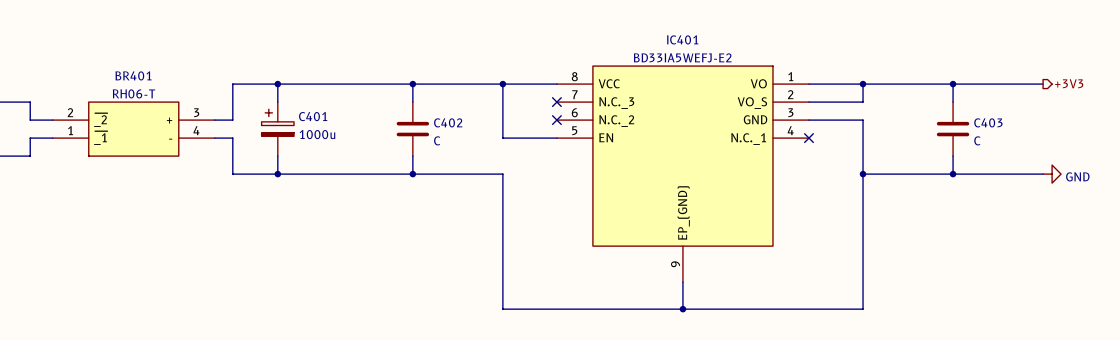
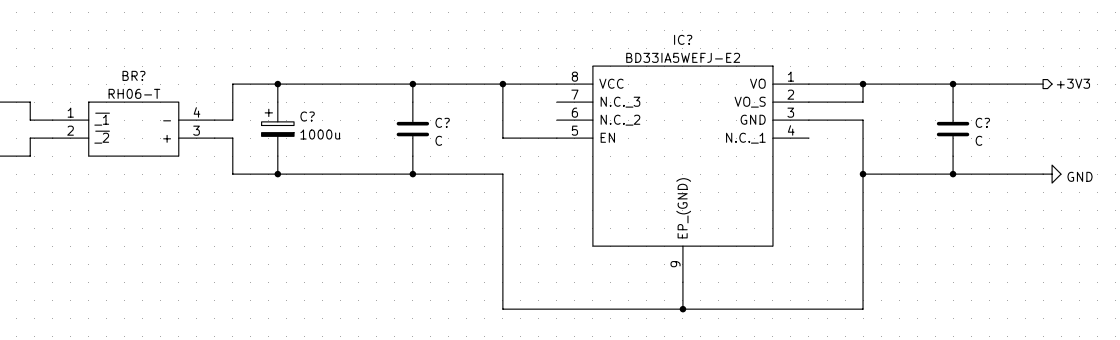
no-connect mark: (556, 102) -> none
C401 name: C401 (313, 116) -> C? (307, 116)
no-connect mark: (556, 120) -> none
C402 name: C402 (448, 122) -> C? (442, 122)
C403 name: C403 (988, 122) -> C? (982, 122)
BR401: RH06-T (133, 129) -> none
BR?: none -> RH06-T (133, 129)
no-connect mark: (808, 138) -> none
IC401: BD33IA5WEFJ-E2 (682, 173) -> none
IC?: none -> BD33IA5WEFJ-E2 (682, 173)

